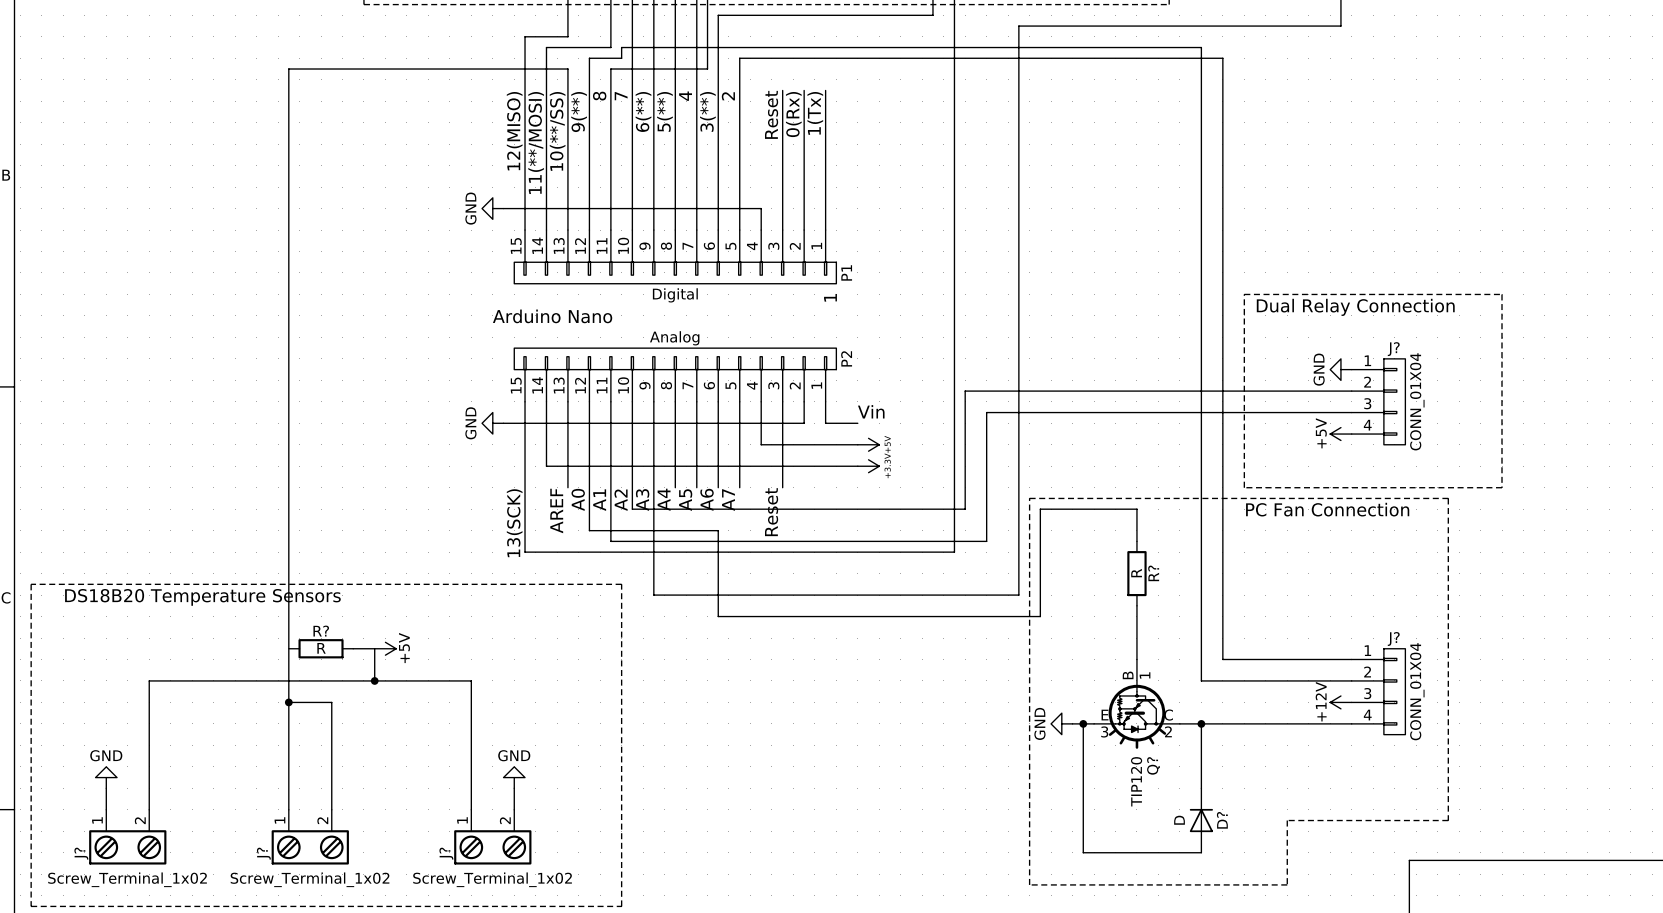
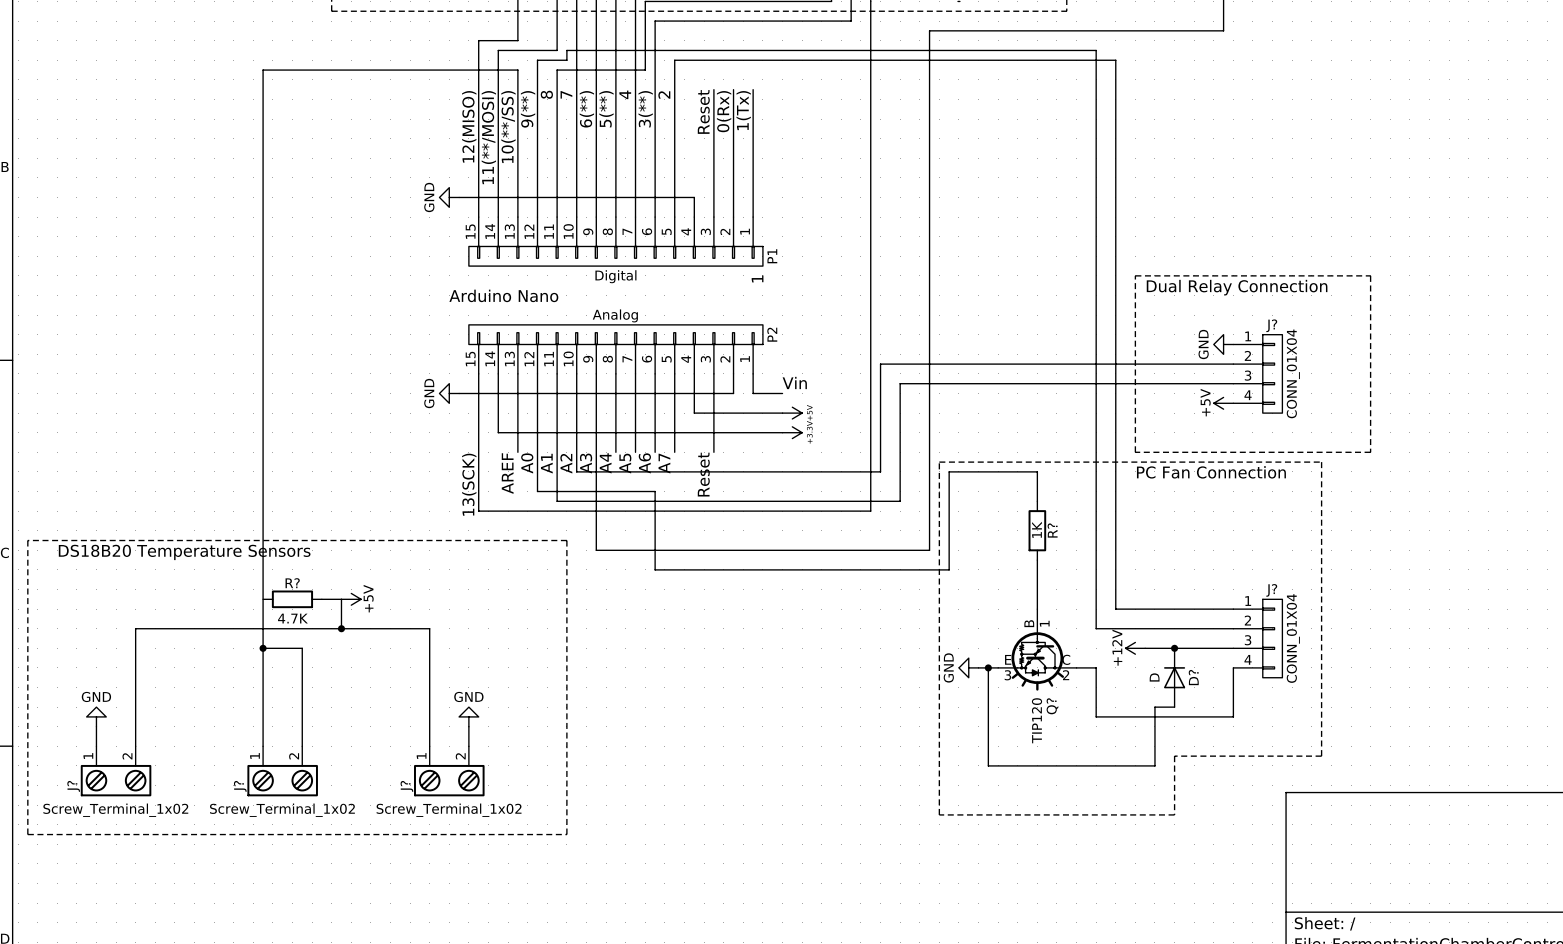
R? value: R (1136, 573) -> 1K (1036, 529)
R? value: R (321, 648) -> 4.7K (292, 618)
wire: none -> (1145, 648) (1233, 648)
junction: none -> (1174, 648)
power symbol position: +12V (1340, 702) -> +12V (1135, 648)
wire: (1201, 723) (1351, 723) -> (1096, 716) (1233, 716) (1233, 667)
junction: (1201, 723) -> none
wire: (1201, 777) (1201, 788) -> none
D? position: (1201, 820) -> (1174, 677)
wire: (1083, 831) (1083, 852) (1201, 852) -> (988, 765) (1154, 765) (1154, 707) (1174, 707)

